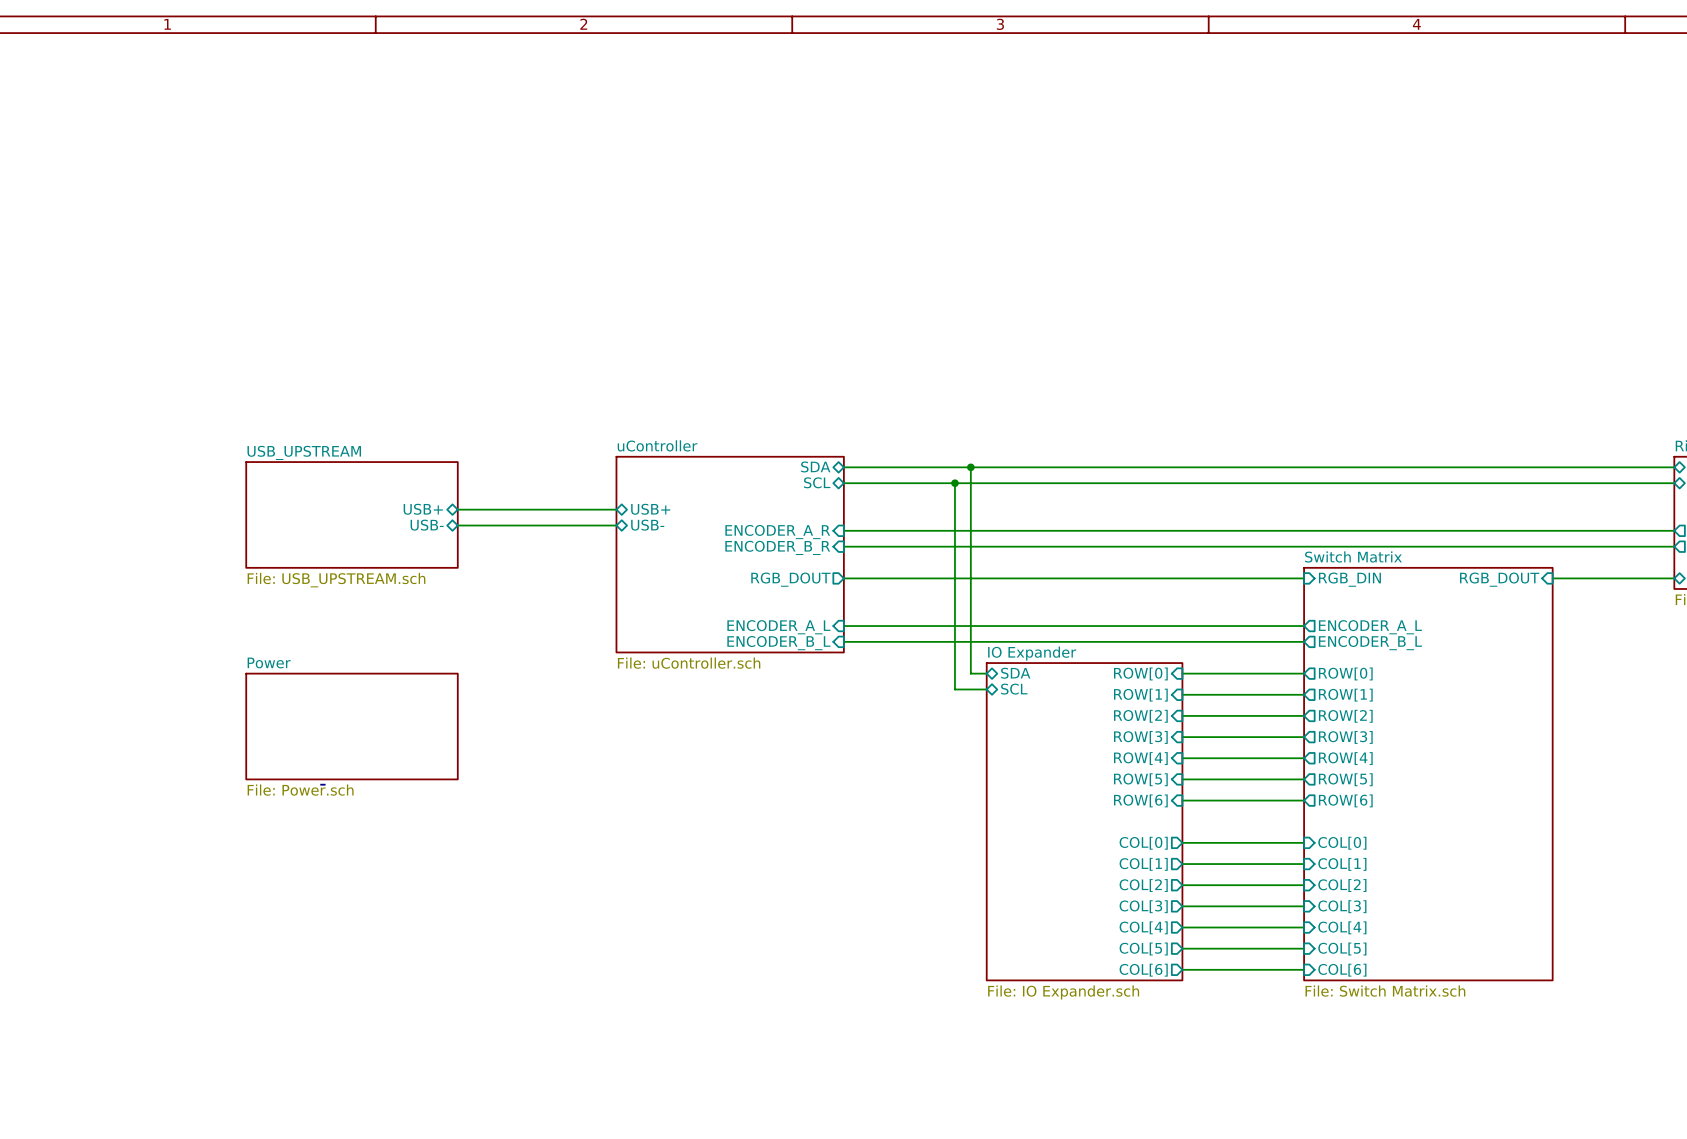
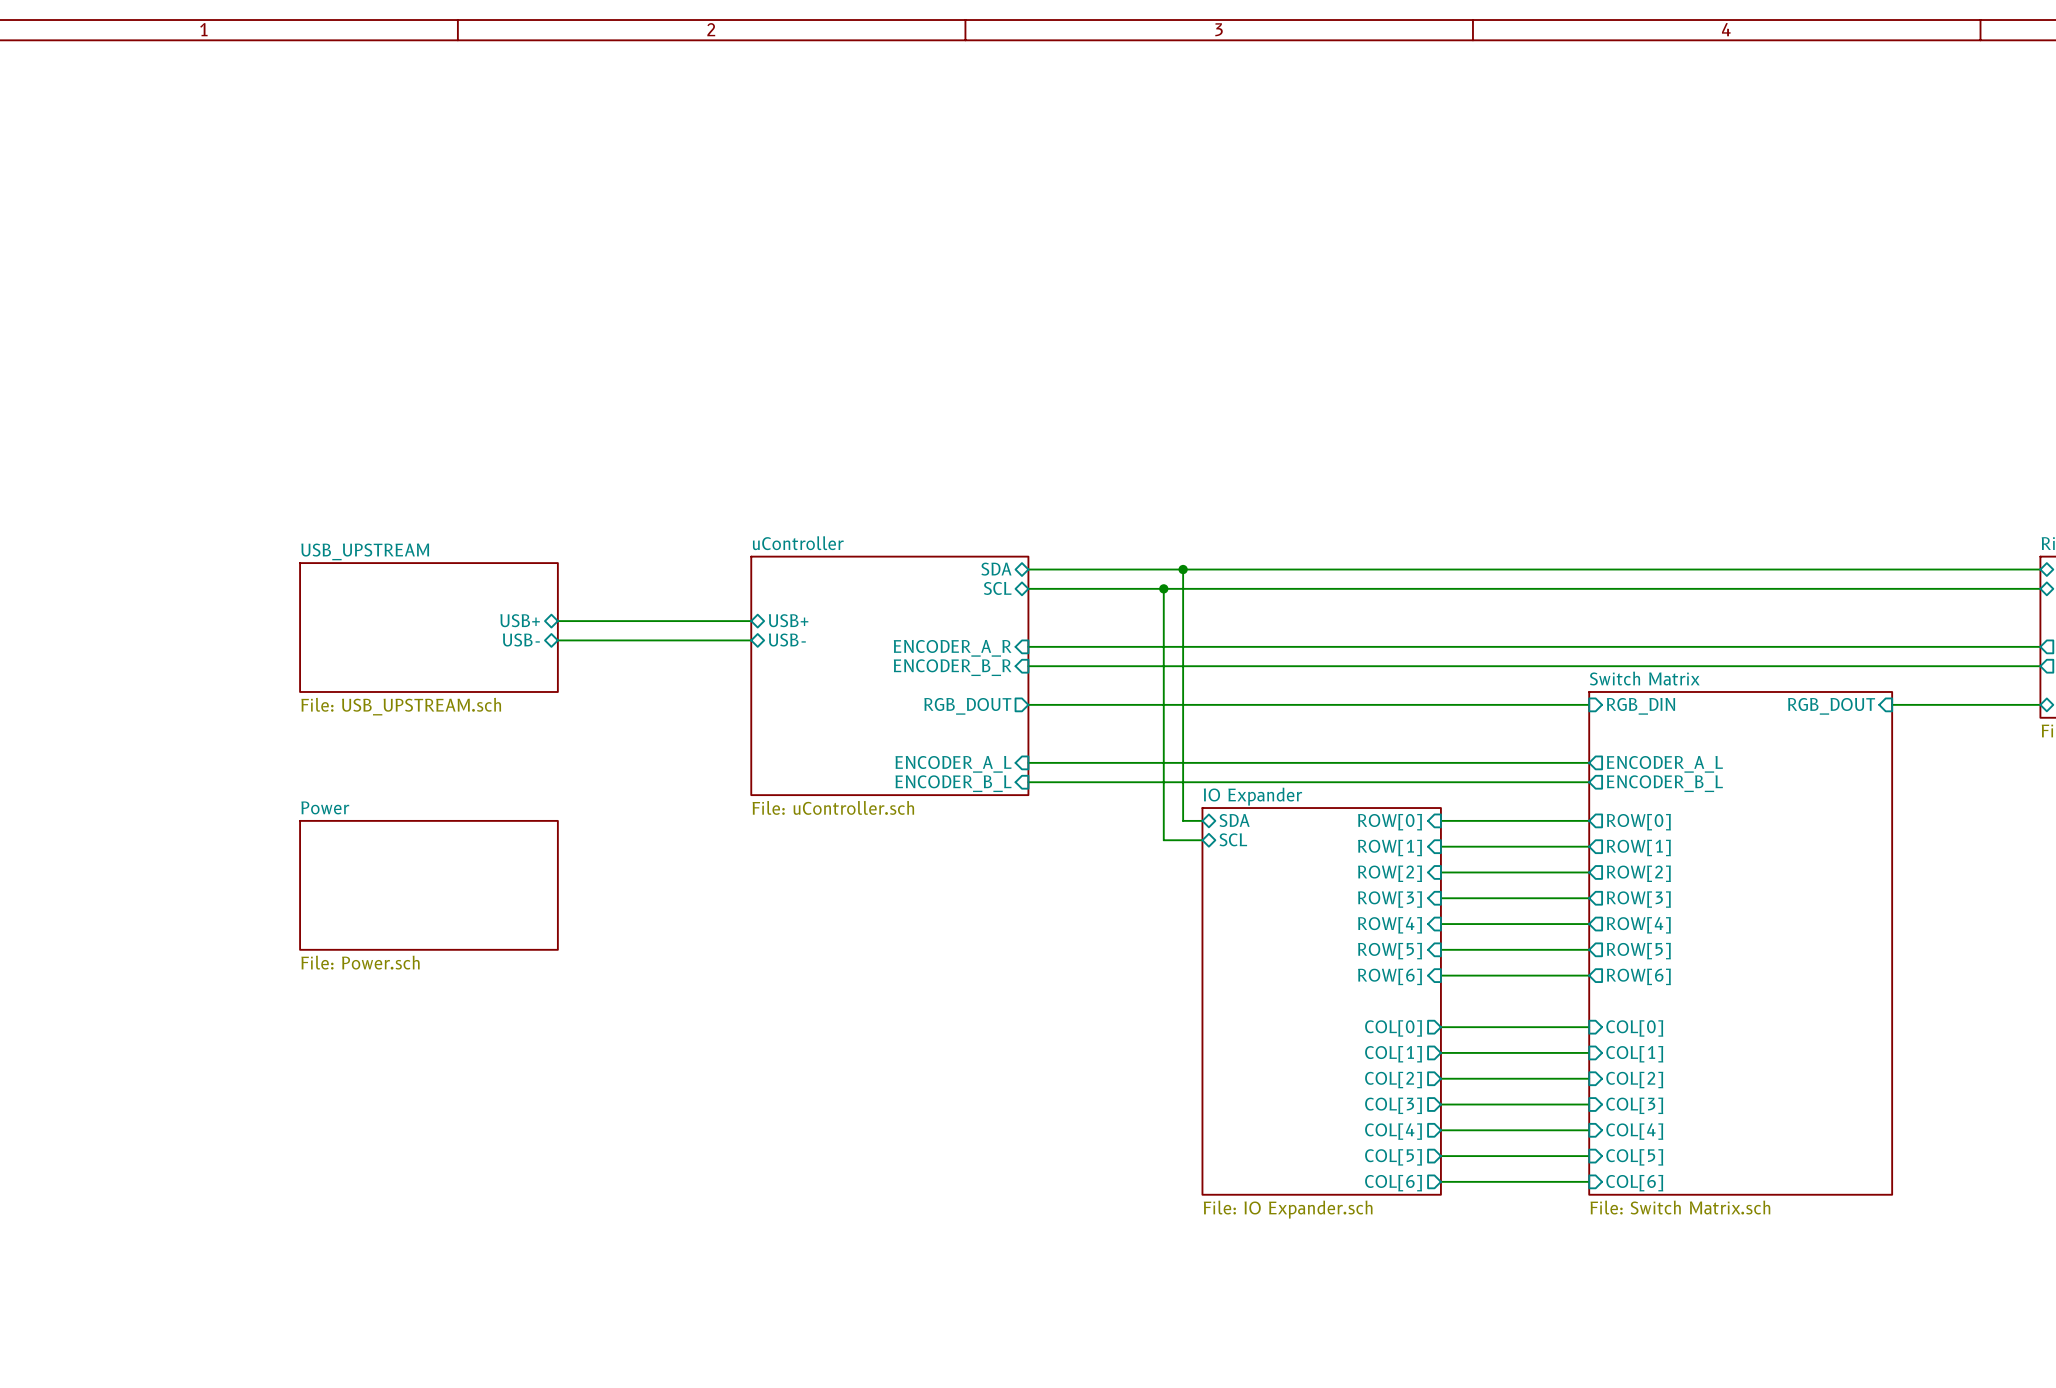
line: (320, 784) (325, 784) -> none

